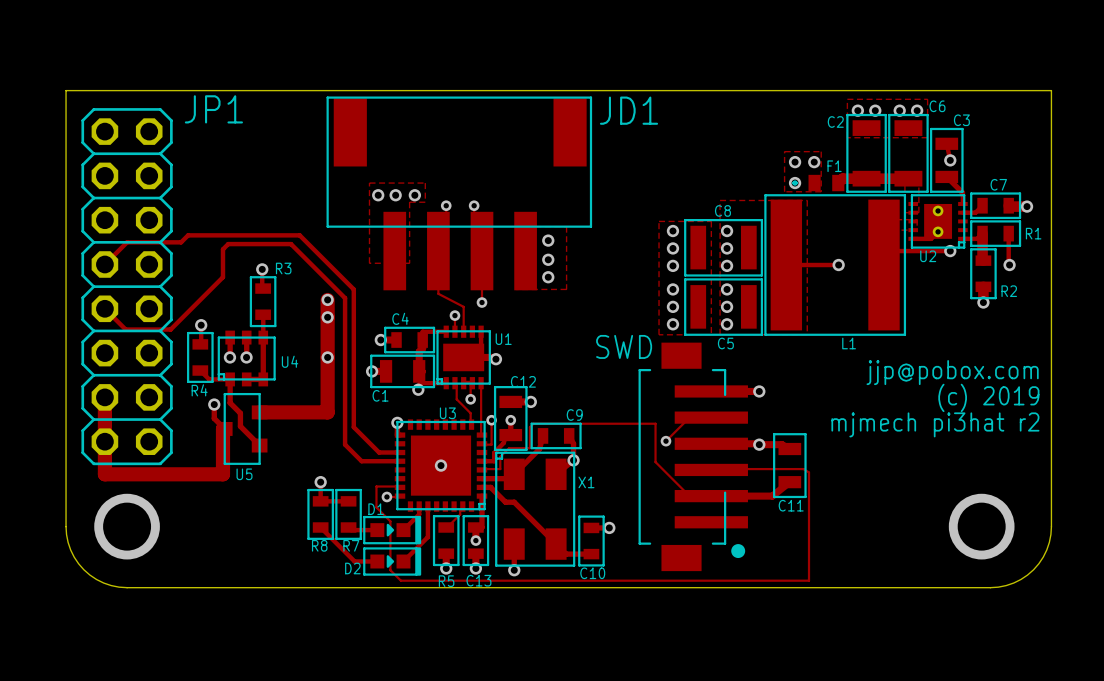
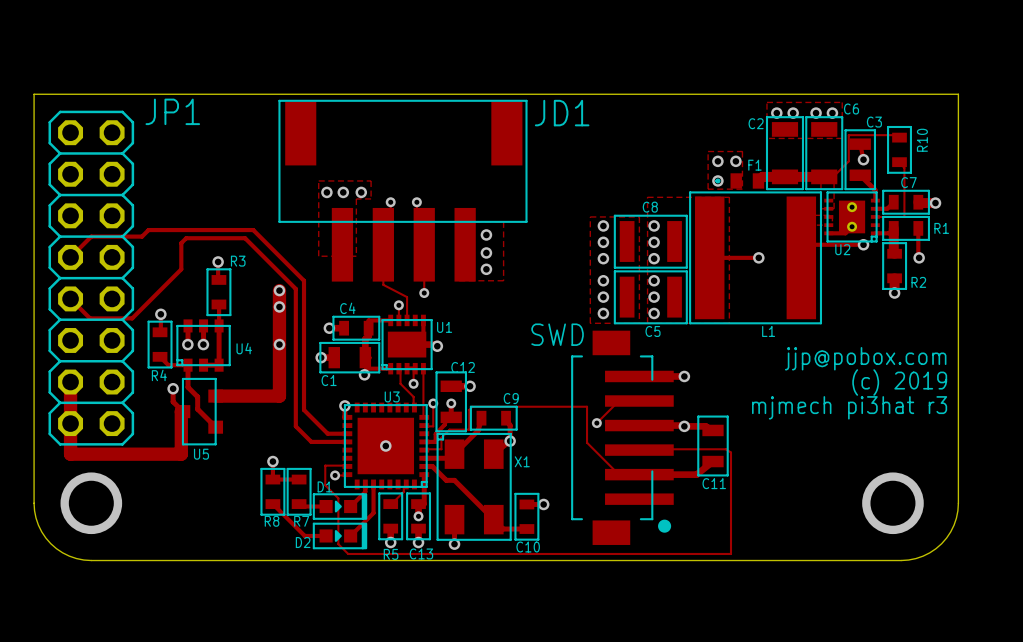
track: none -> (899, 137) (897, 135) (848, 135) (848, 161) (835, 174) (824, 176)
R10: none -> (899, 149)
track: none -> (899, 162) (904, 167) (904, 216) (875, 216)
text: mjmech pi3hat r2 (935, 424) -> mjmech pi3hat r3 (849, 407)

